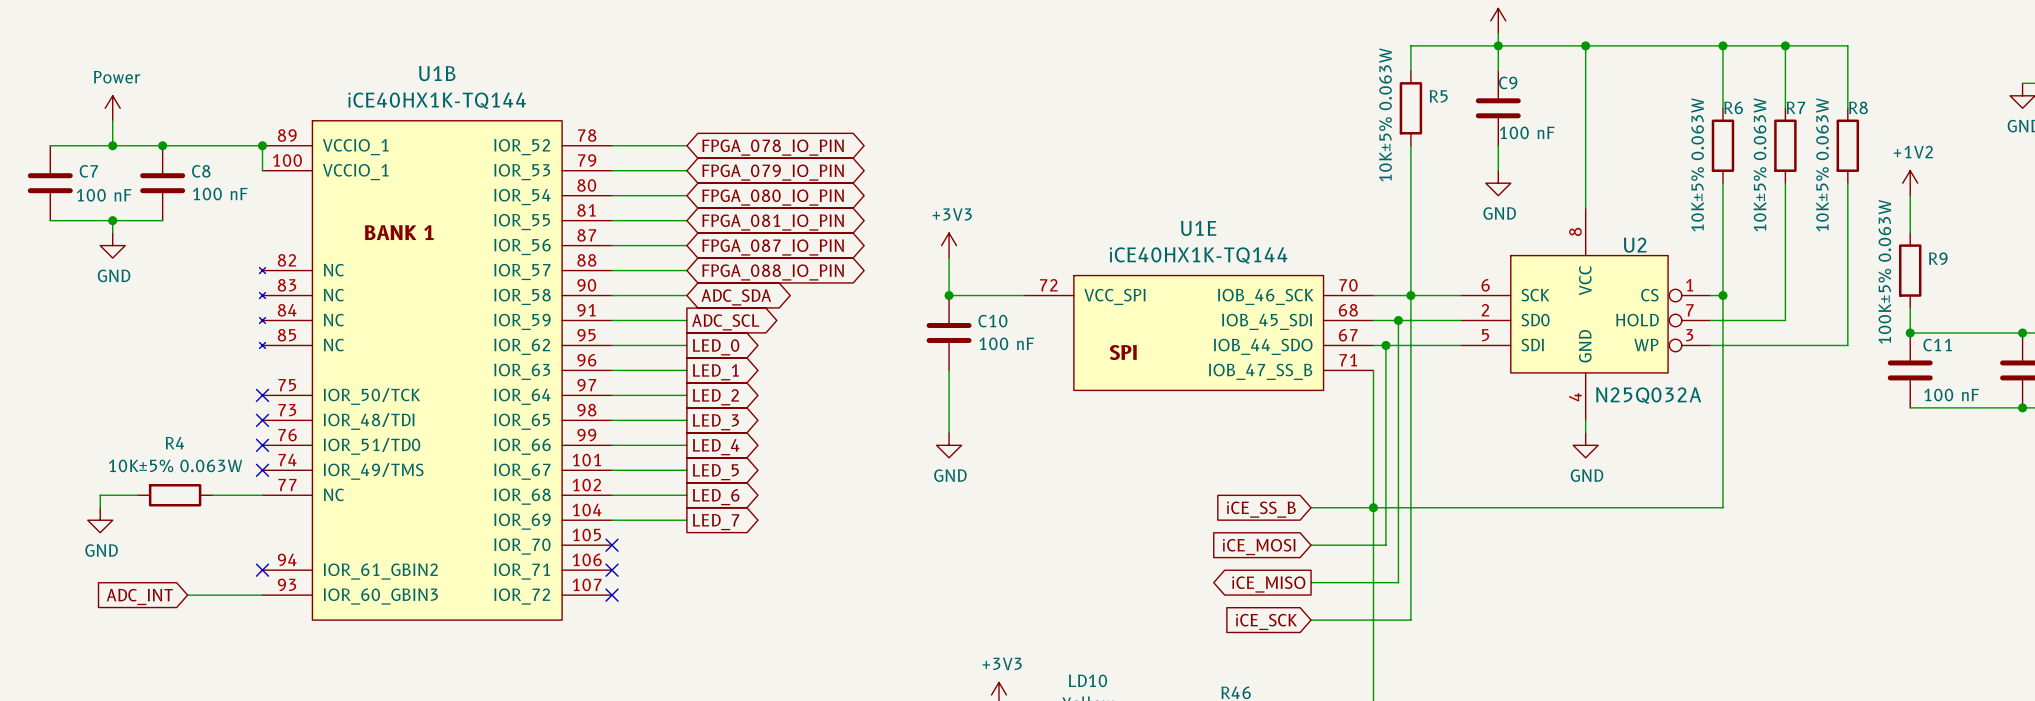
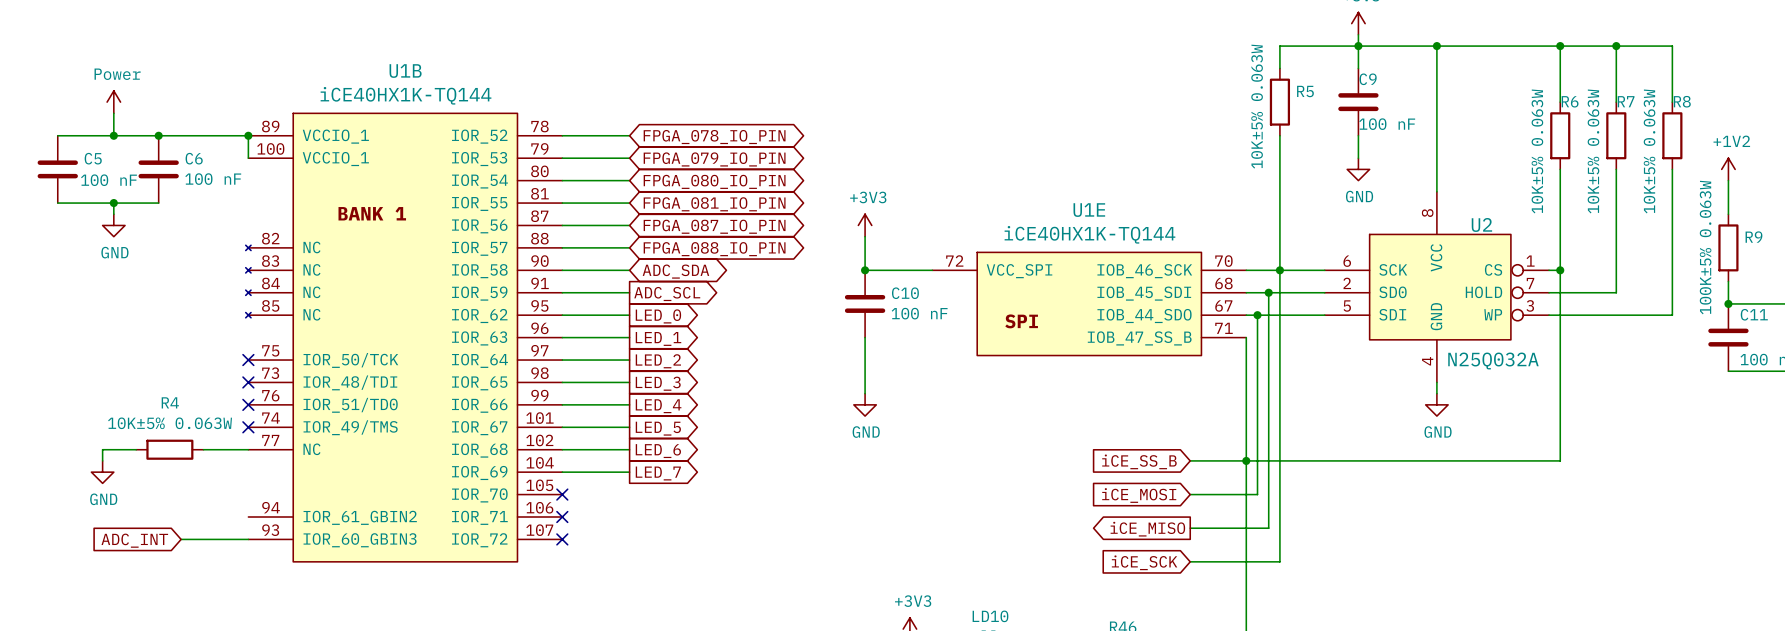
C7 name: C7 (88, 171) -> C5 (93, 158)
C8 name: C8 (201, 171) -> C6 (194, 158)
no-connect mark: (262, 570) -> none

